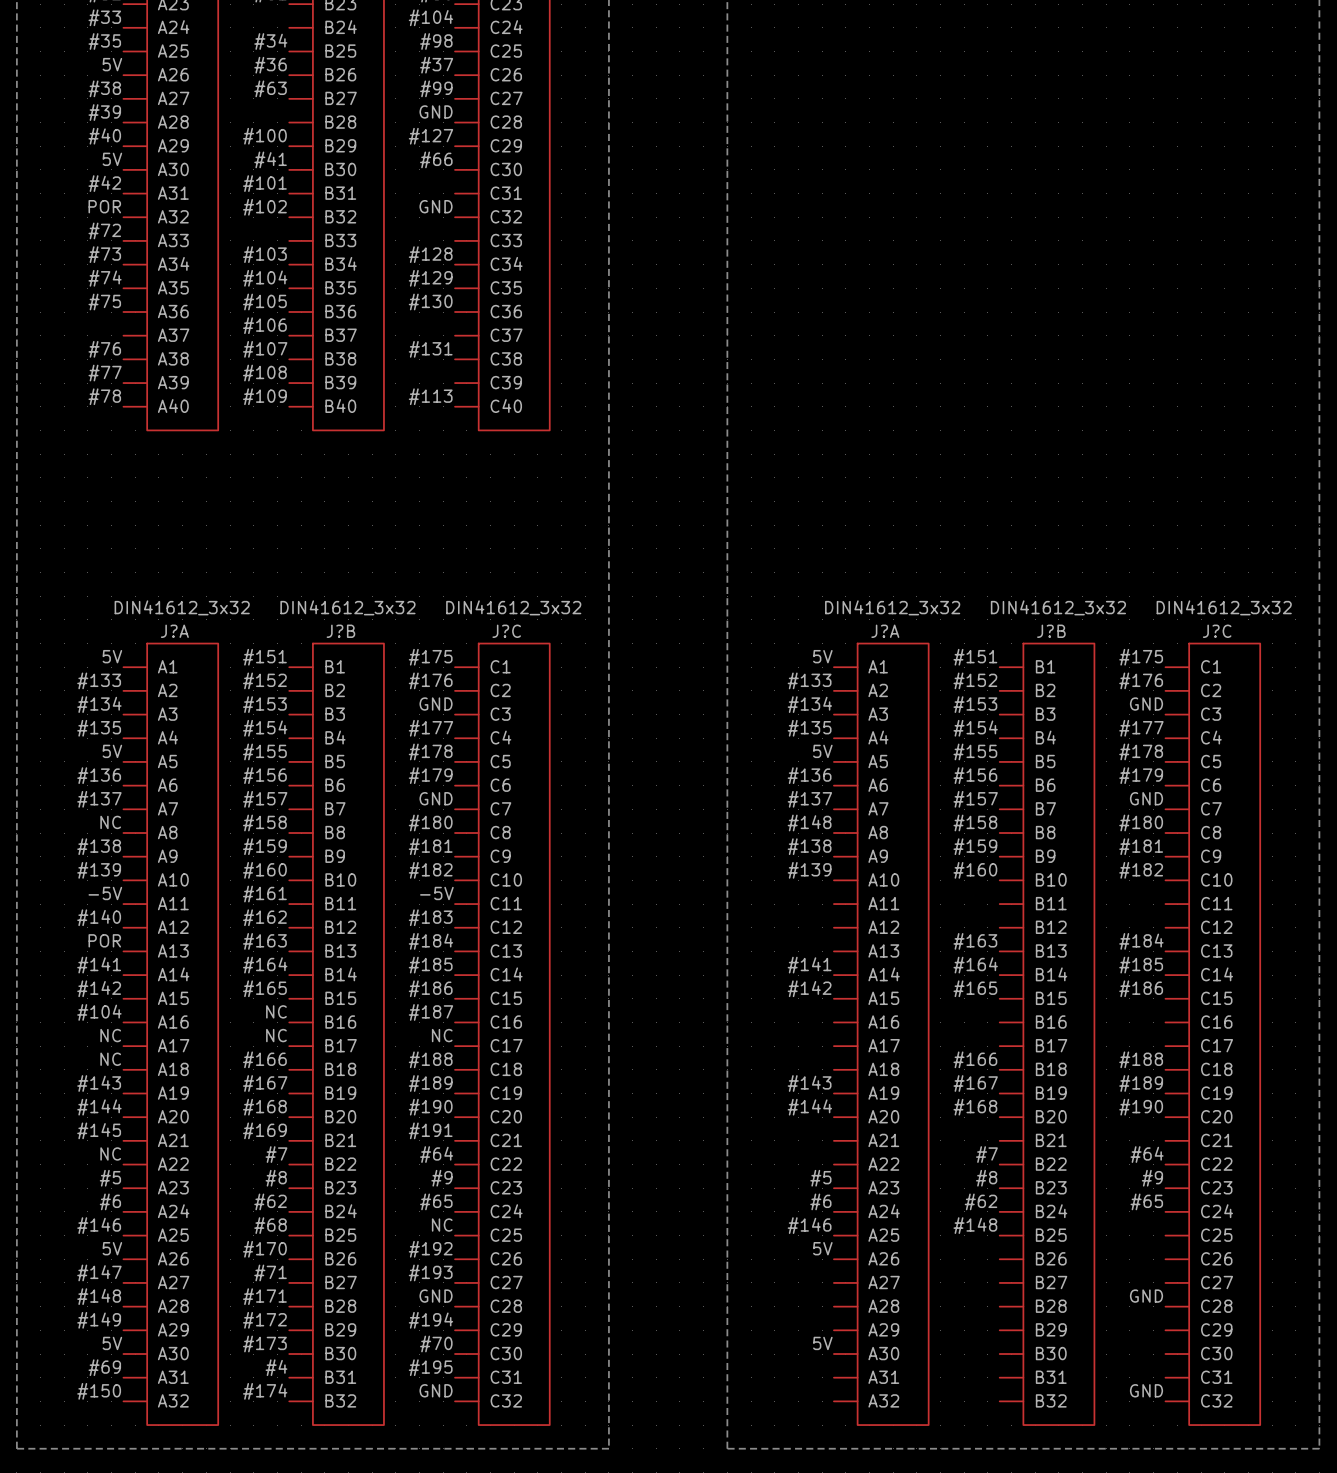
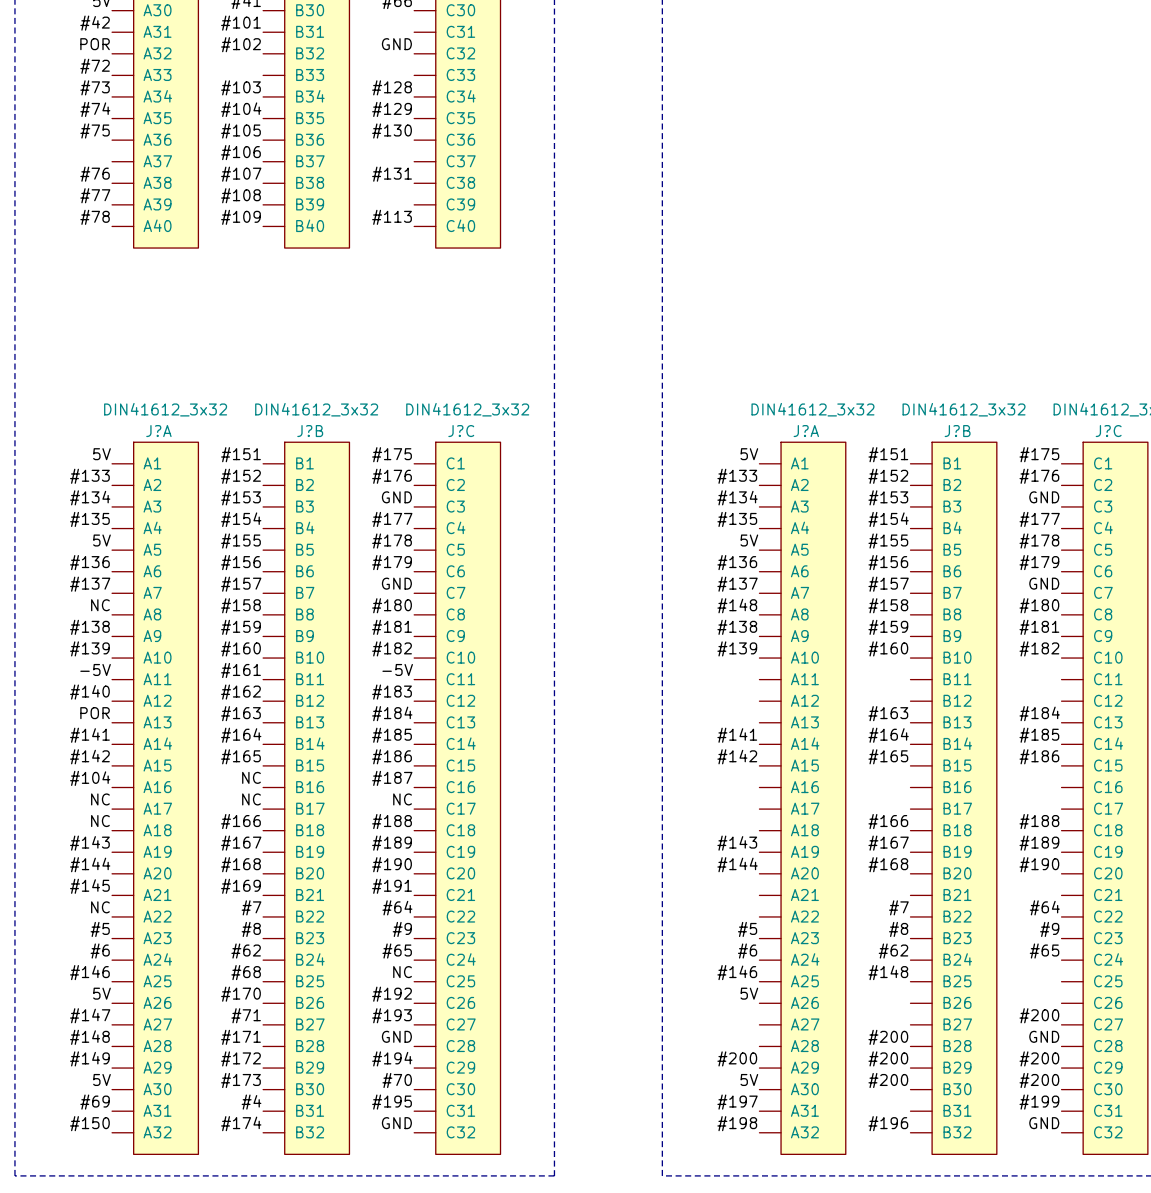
label: none -> #200 (1039, 1015)
label: none -> #200 (888, 1037)
label: none -> #200 (737, 1058)
label: none -> #200 (888, 1058)
label: none -> #200 (1039, 1058)
label: none -> #200 (888, 1080)
label: none -> #200 (1039, 1080)
label: none -> #197 (737, 1102)
label: none -> #199 (1039, 1102)
label: none -> #198 (737, 1123)
label: none -> #196 (888, 1123)

